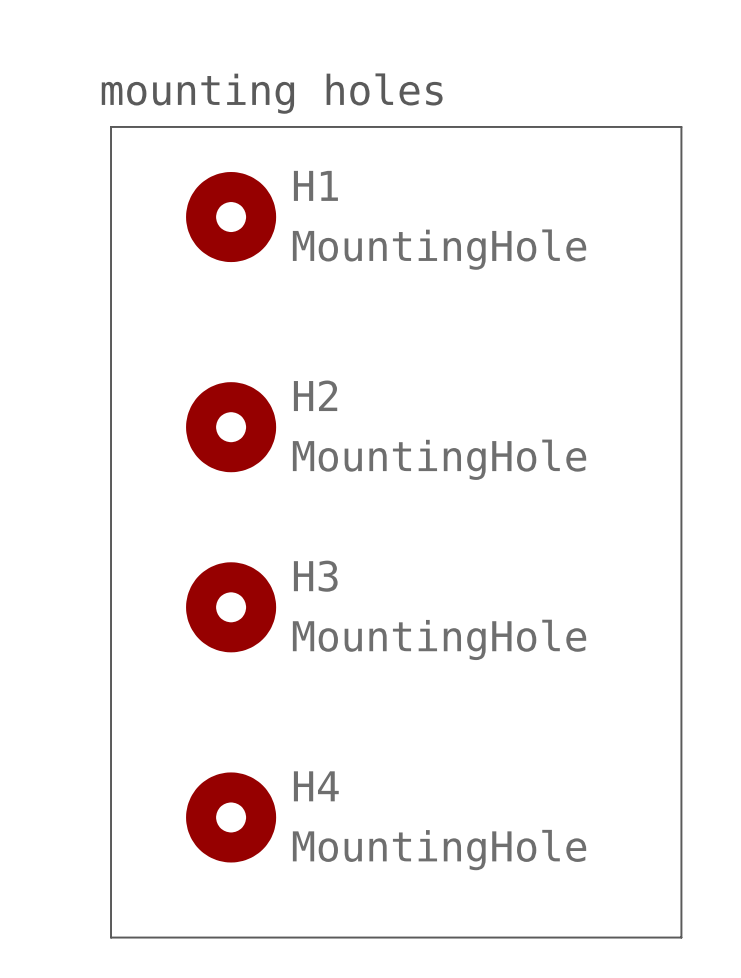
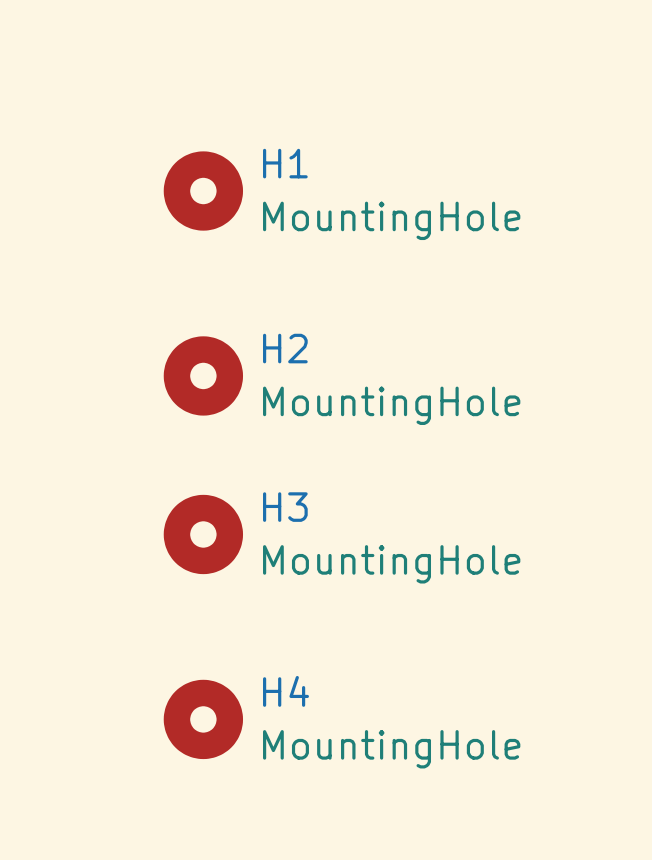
text: mounting holes (272, 93) -> none
line: (111, 126) (681, 126) (681, 937) (111, 937) (111, 126) -> none

